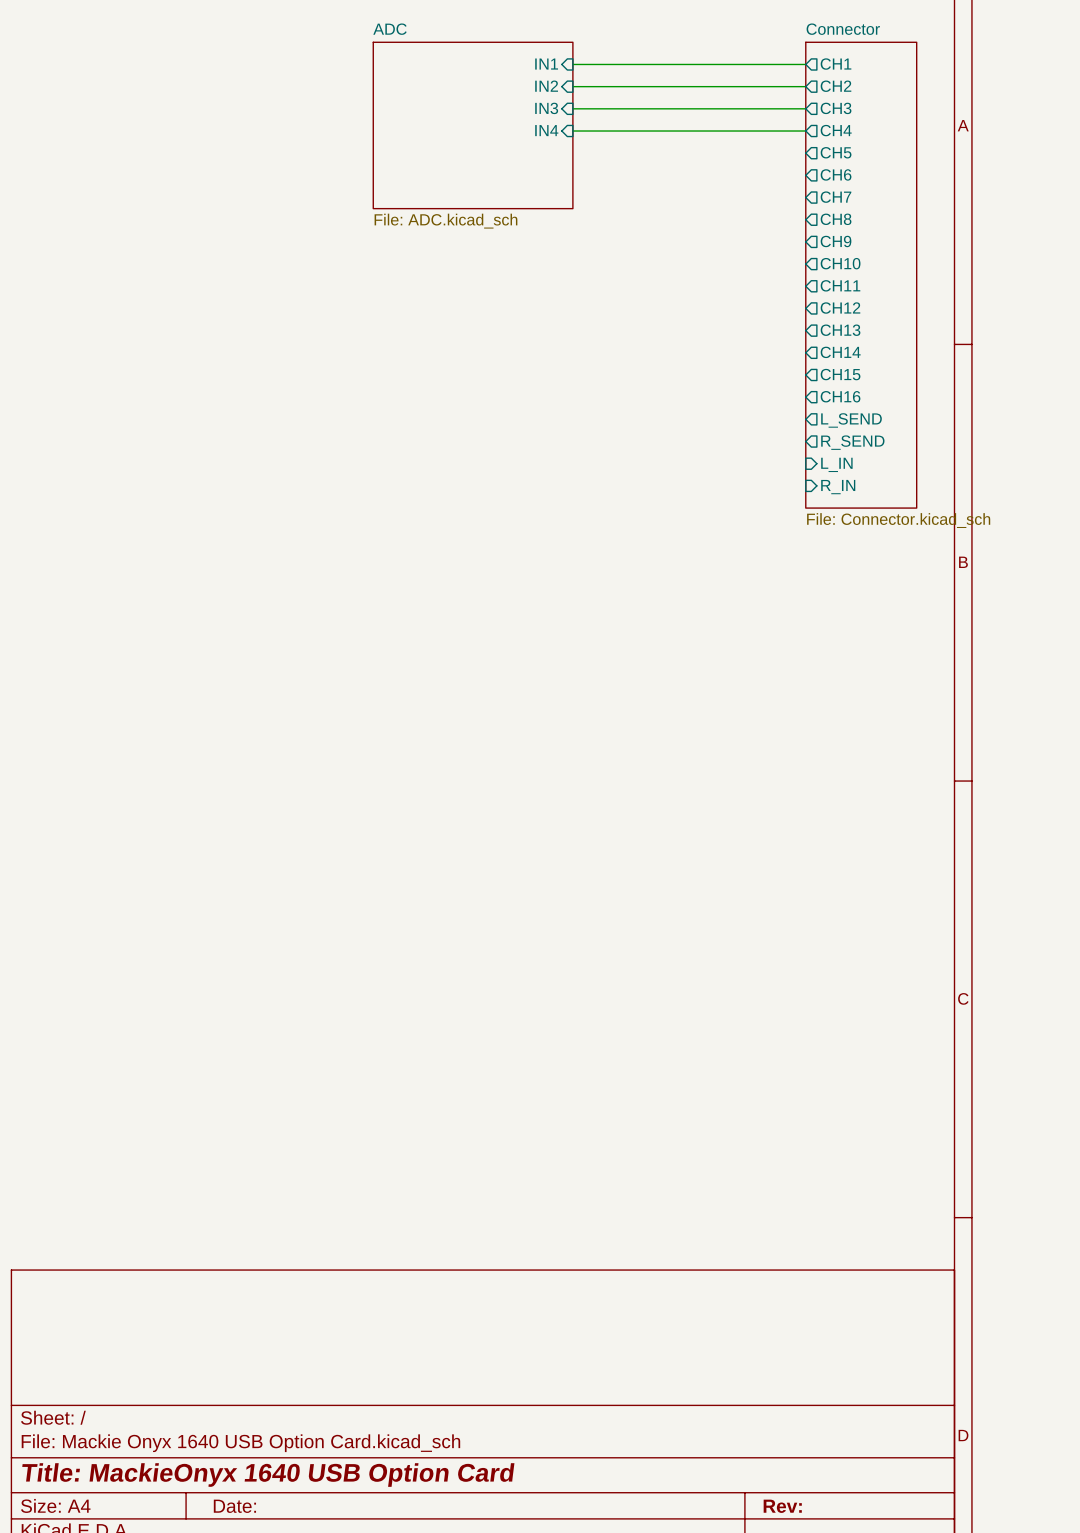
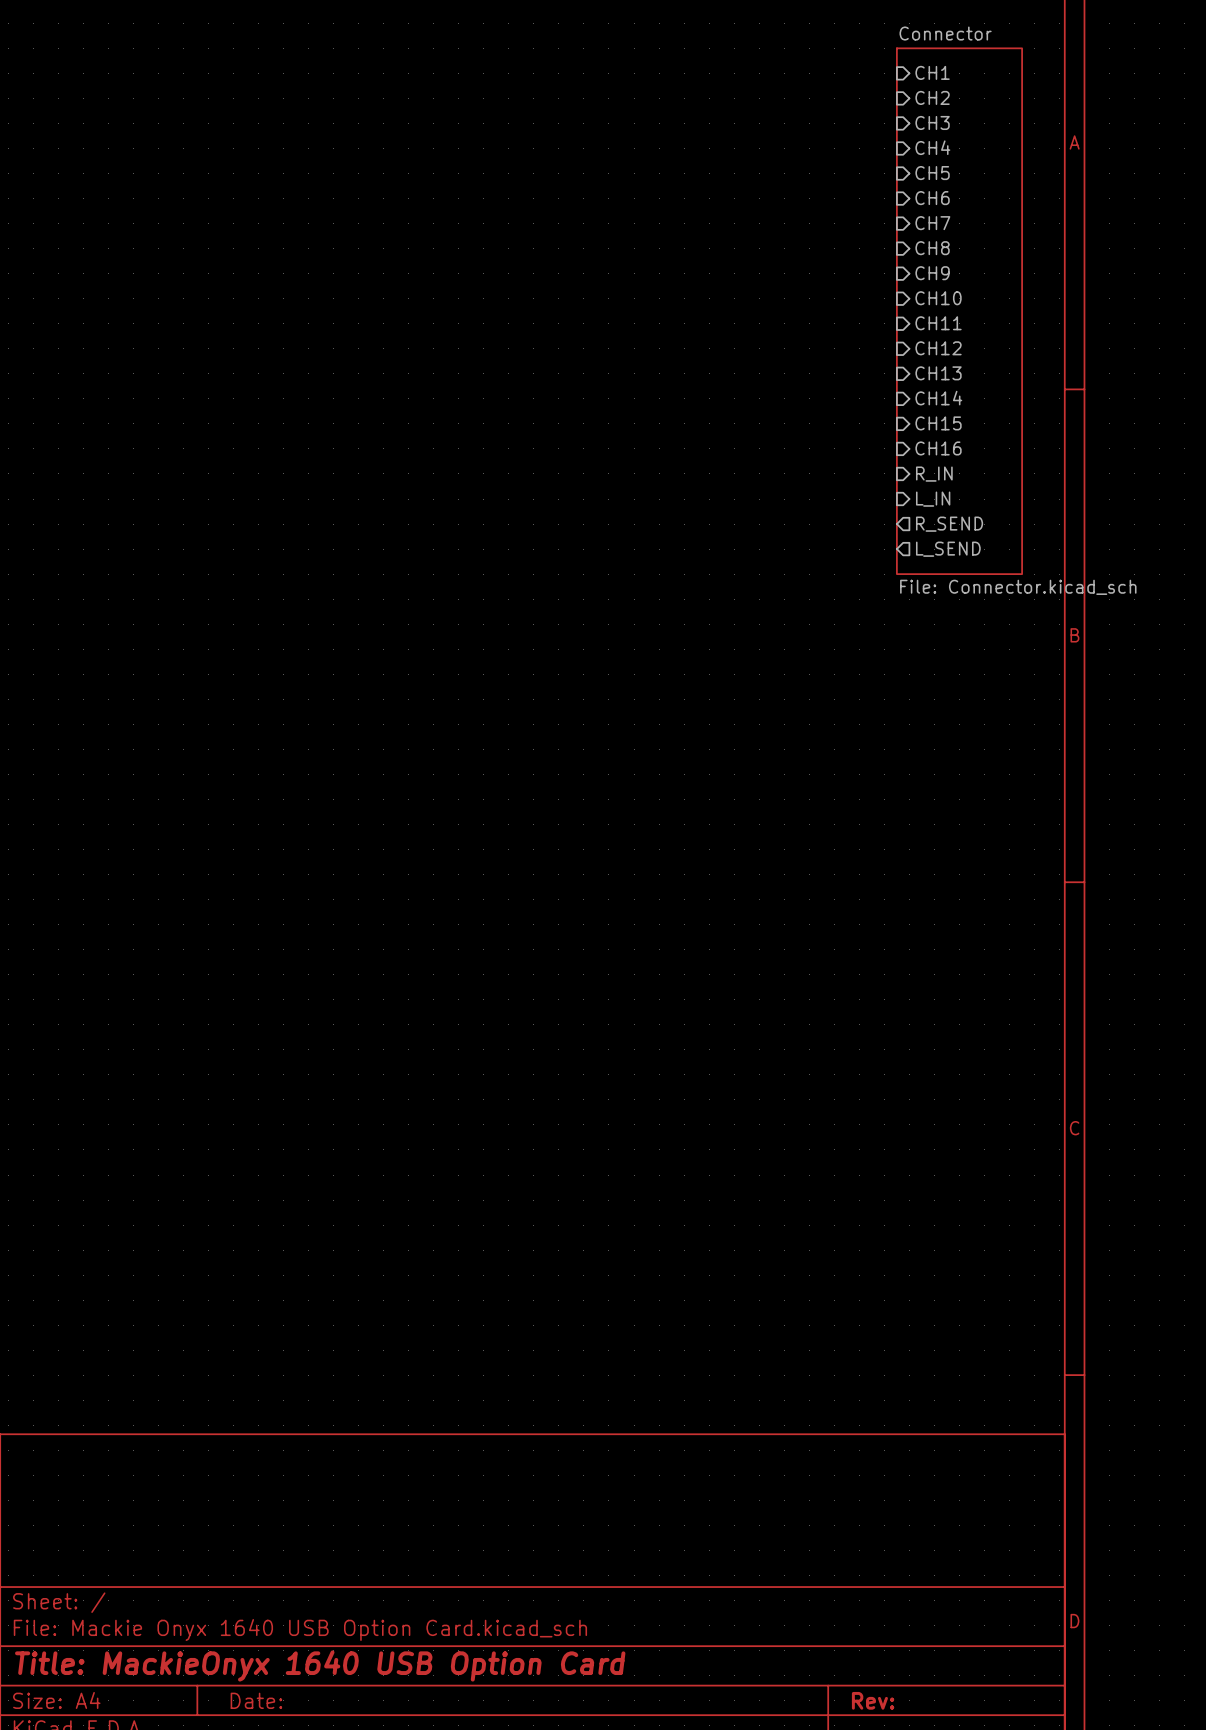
sheet pin: IN1 (546, 64) -> none
wire: (572, 64) (805, 64) -> none
sheet pin shape: output (836, 64) -> input (932, 72)
sheet pin: IN2 (546, 86) -> none
wire: (572, 86) (805, 86) -> none
sheet pin shape: output (836, 86) -> input (932, 97)
sheet pin: IN3 (546, 108) -> none
wire: (572, 108) (805, 108) -> none
sheet pin shape: output (836, 108) -> input (932, 122)
sheet ADC: File: ADC.kicad_sch (473, 125) -> none
sheet pin: IN4 (546, 130) -> none
sheet pin shape: output (836, 130) -> input (932, 147)
wire: (572, 131) (805, 131) -> none
sheet pin shape: output (836, 152) -> input (932, 173)
sheet pin shape: output (836, 174) -> input (932, 198)
sheet pin shape: output (836, 197) -> input (932, 223)
sheet pin shape: output (836, 219) -> input (932, 248)
sheet pin shape: output (836, 241) -> input (932, 273)
sheet pin shape: output (840, 263) -> input (938, 298)
sheet pin shape: output (840, 285) -> input (938, 323)
sheet pin shape: output (840, 308) -> input (938, 348)
sheet pin shape: output (840, 330) -> input (938, 373)
sheet pin shape: output (840, 352) -> input (938, 398)
sheet pin shape: output (840, 374) -> input (938, 423)
sheet pin shape: output (840, 396) -> input (938, 448)
sheet pin shape: output (851, 420) -> input (934, 474)
sheet pin: L_SEND (851, 420) -> R_IN (934, 474)
sheet pin shape: output (852, 442) -> input (933, 499)
sheet pin: R_SEND (852, 442) -> L_IN (933, 499)
sheet pin shape: input (836, 464) -> output (949, 524)
sheet pin: L_IN (836, 464) -> R_SEND (949, 524)
sheet pin shape: input (838, 487) -> output (948, 549)
sheet pin: R_IN (838, 487) -> L_SEND (948, 549)

